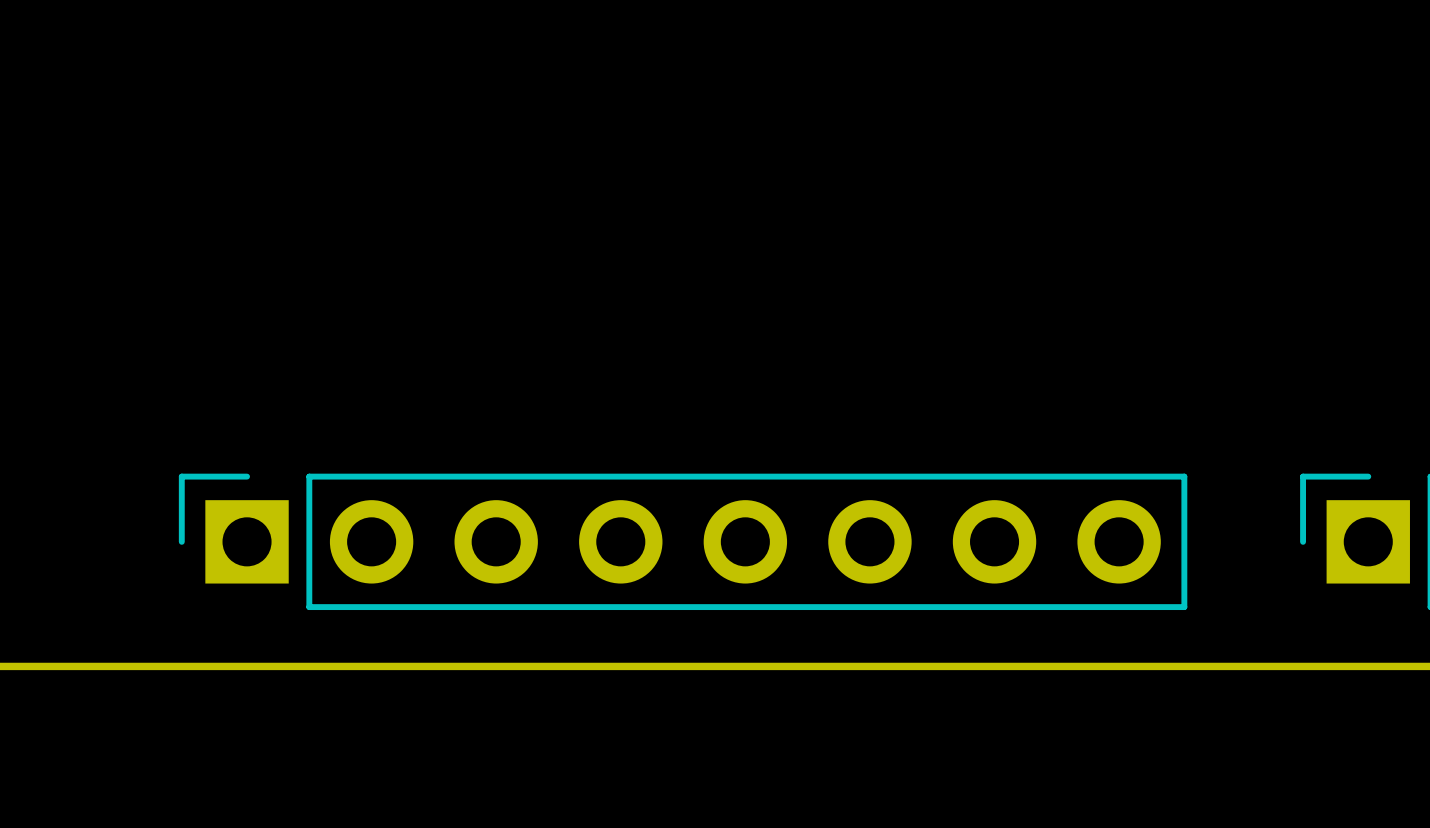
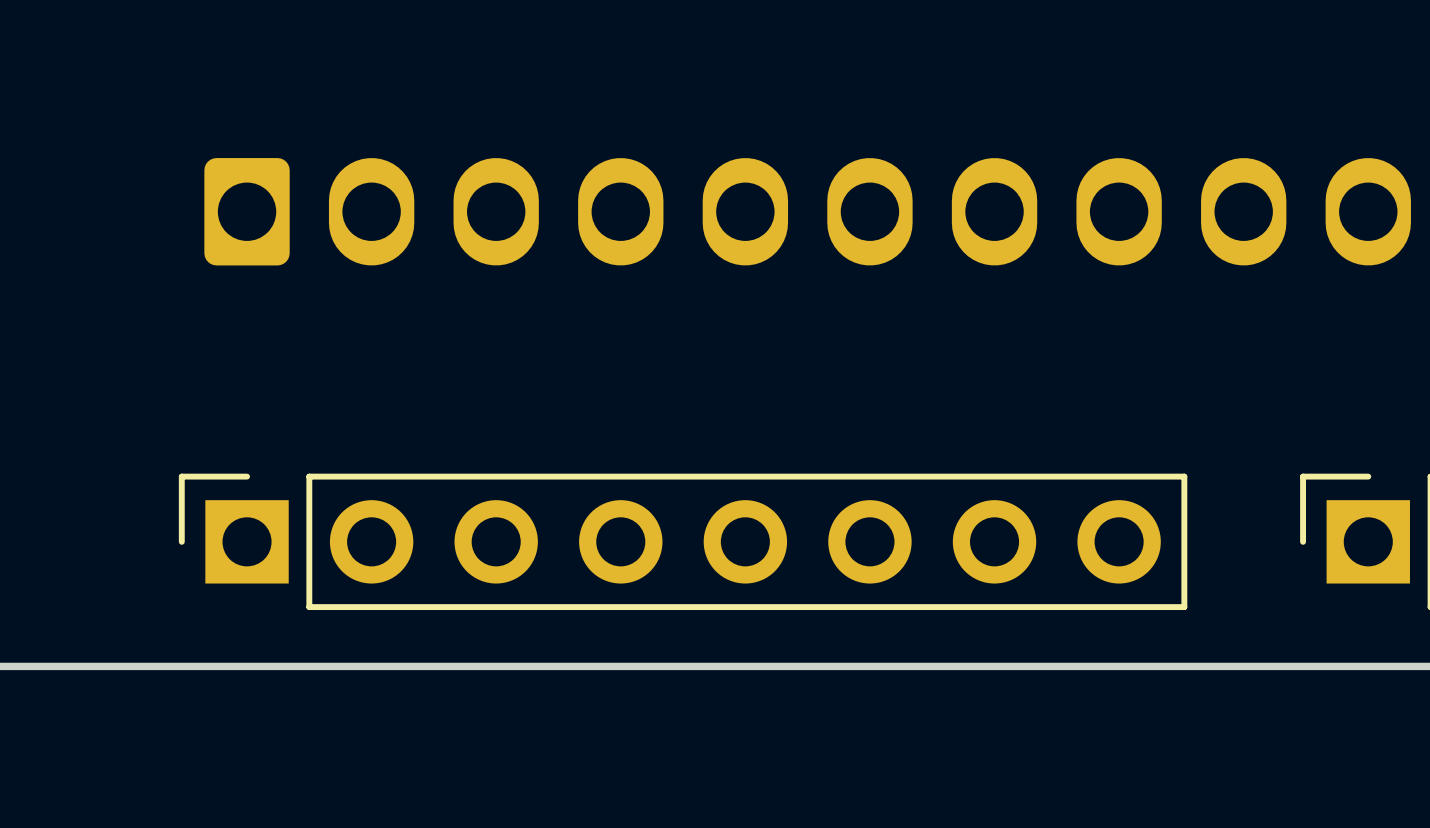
part: none -> (807, 211)

